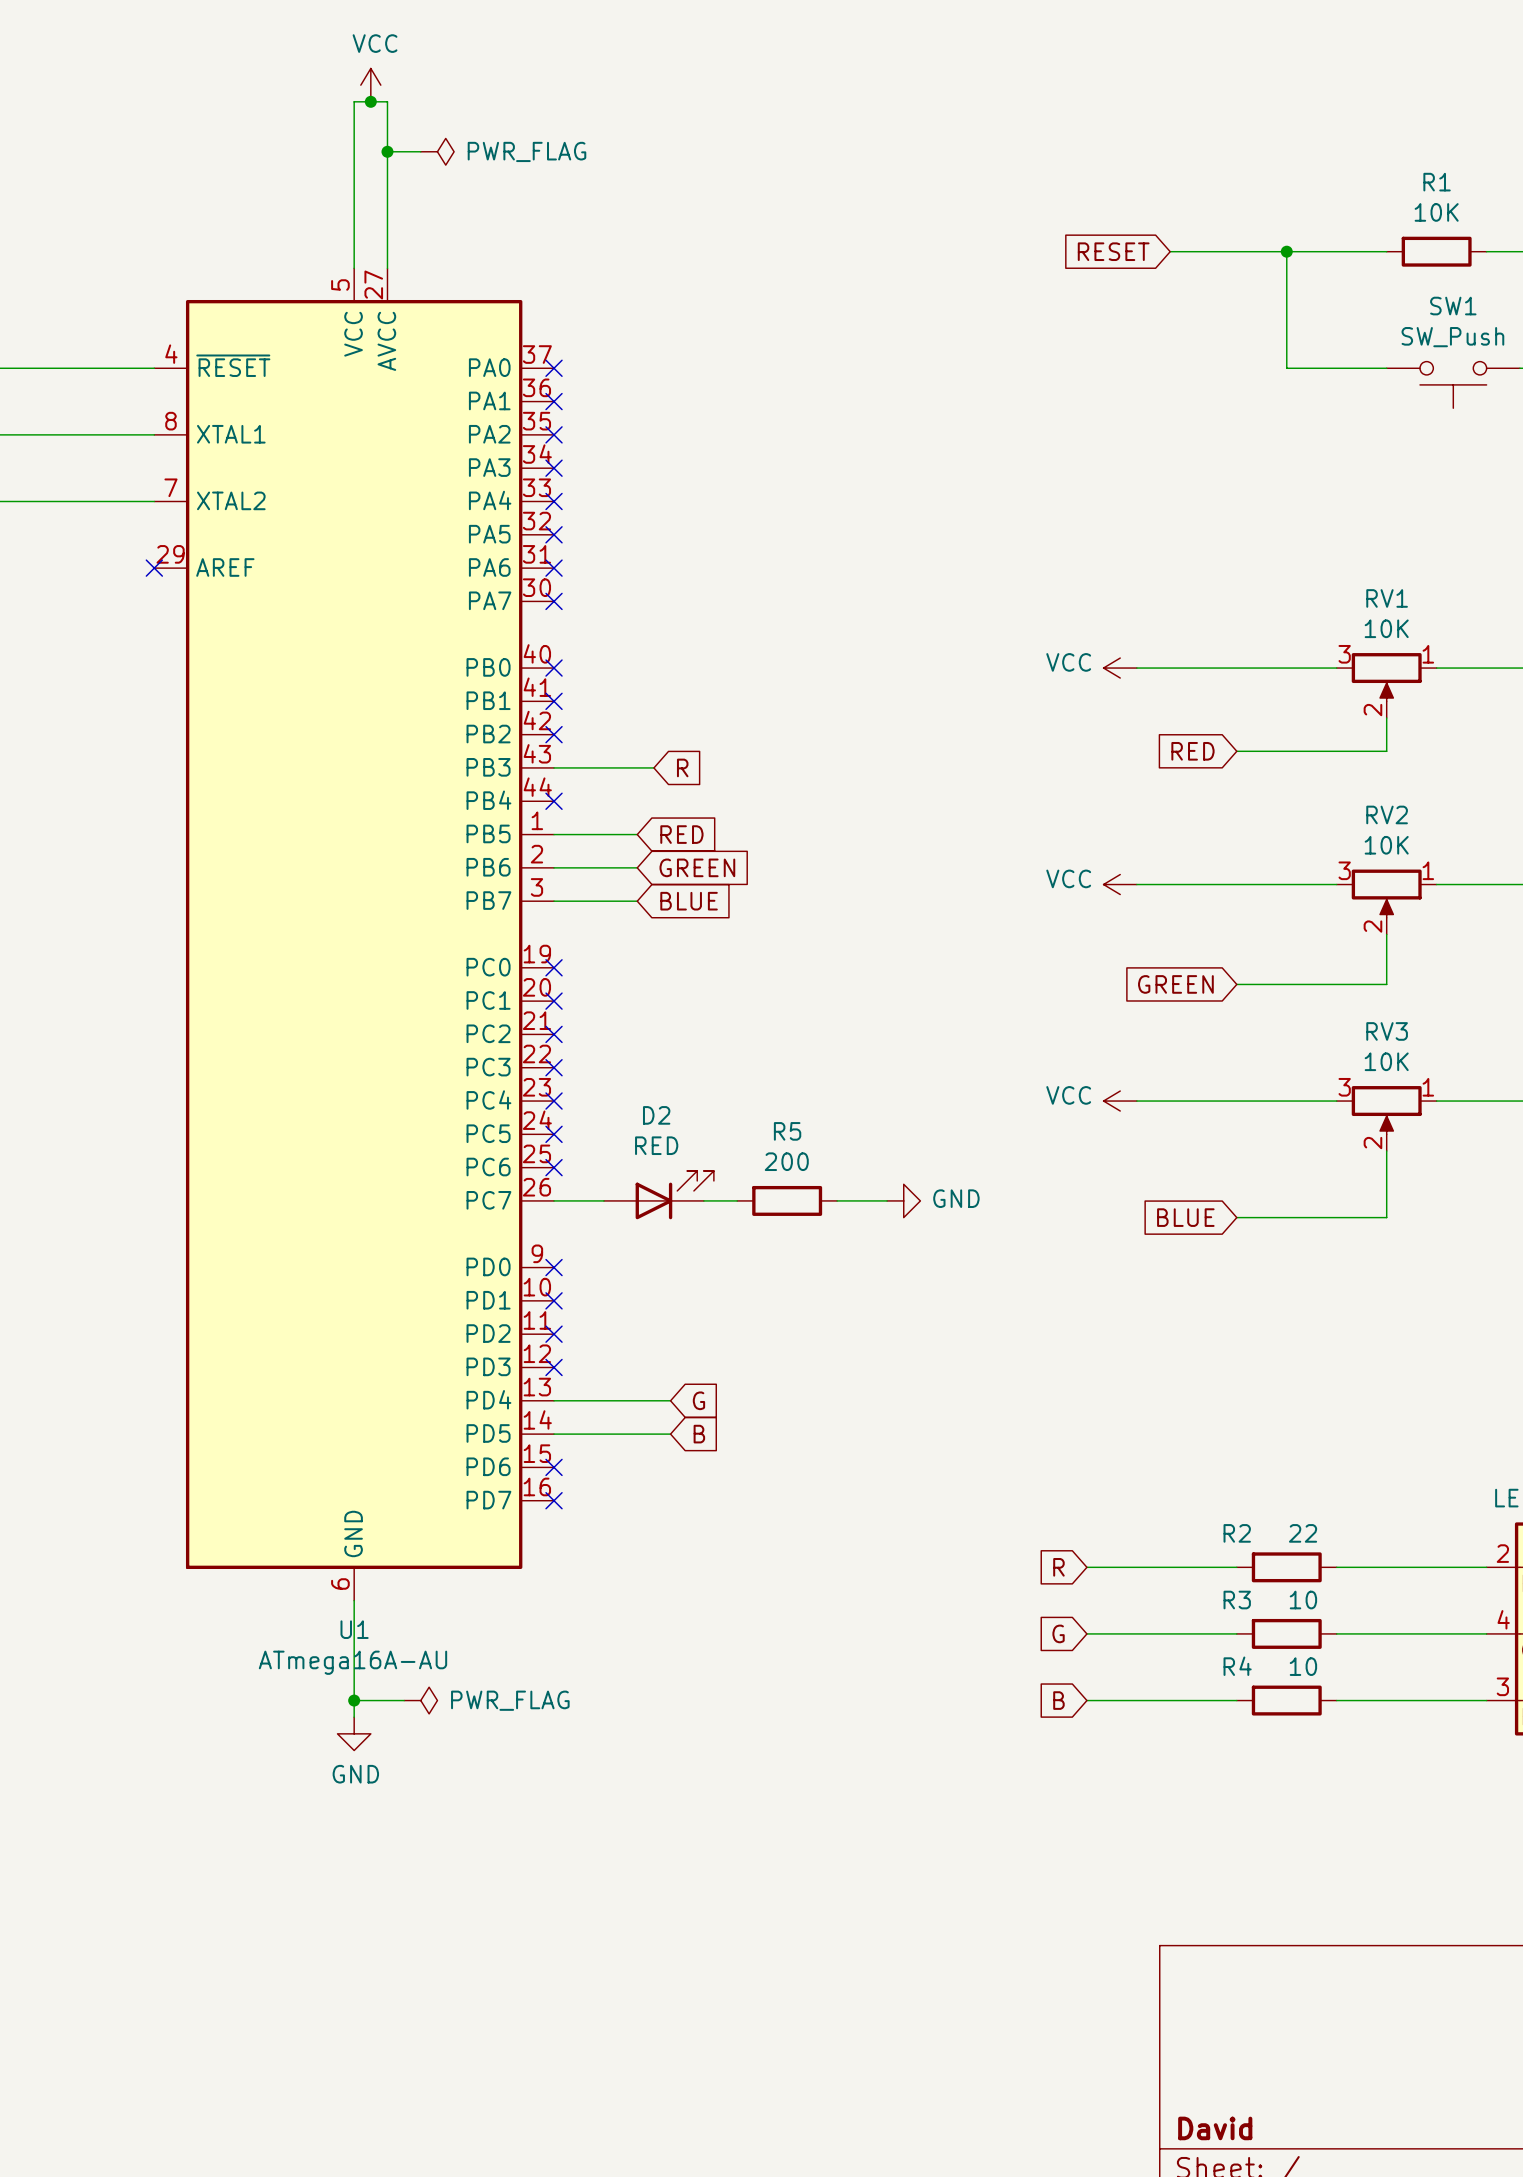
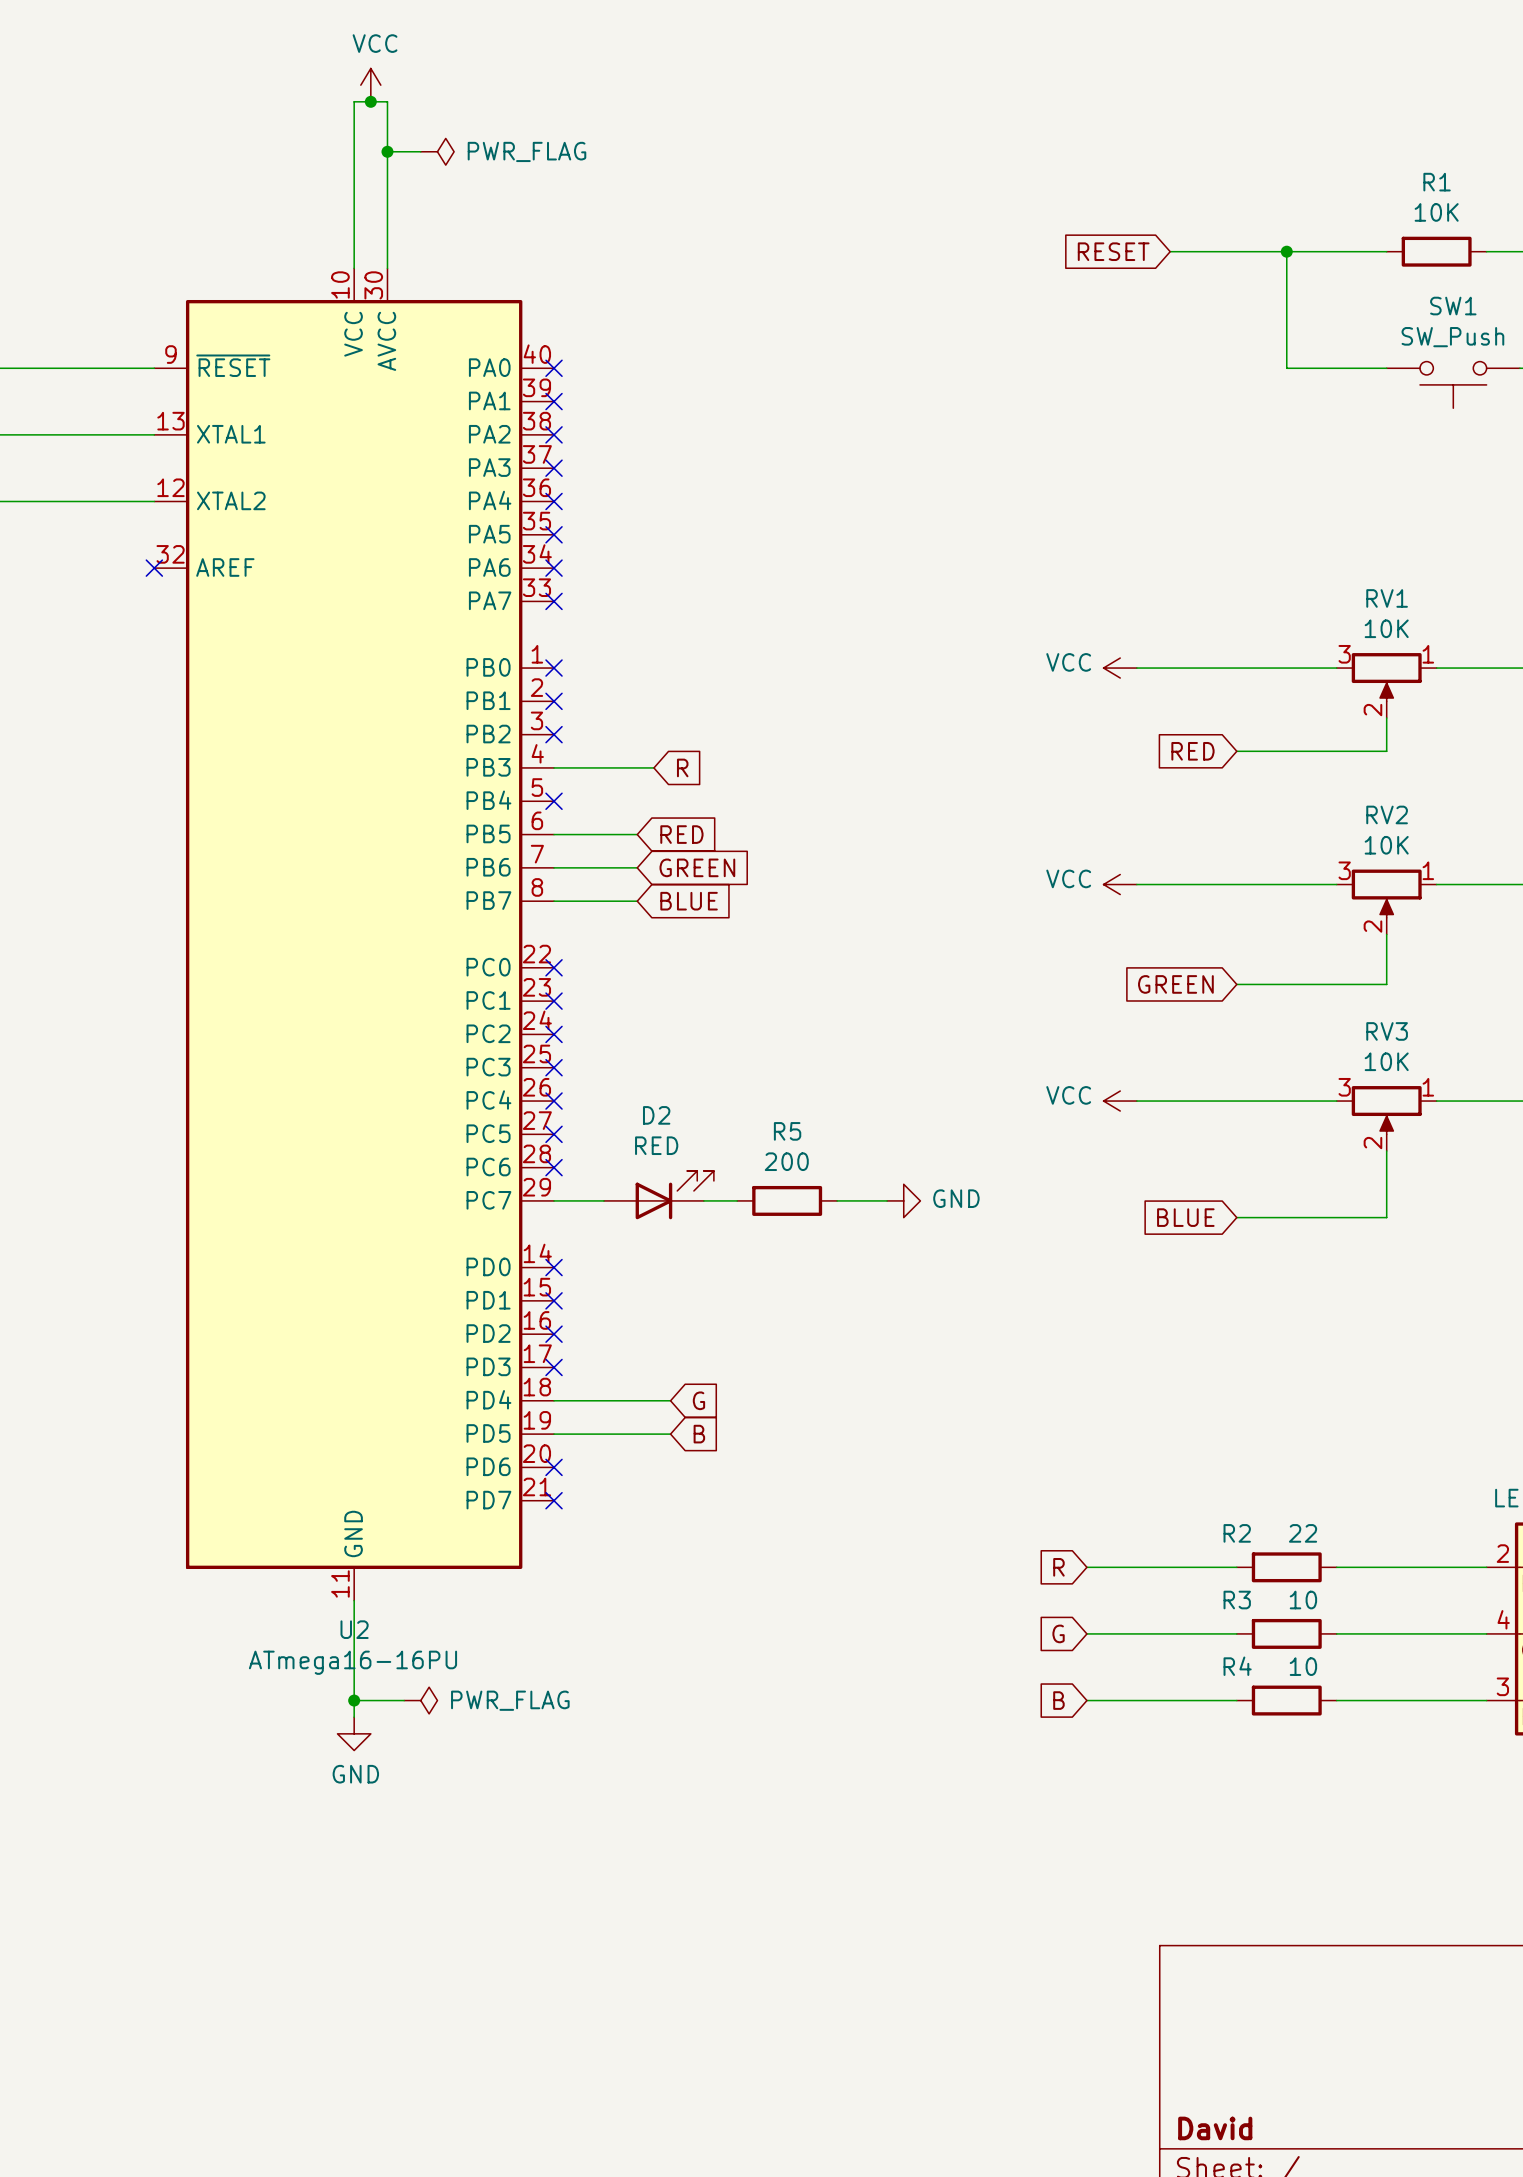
U1 symbol: [154, 268, 555, 1601] -> [154, 268, 555, 1601]
U1 name: U1 (354, 1629) -> U2 (354, 1629)
U1 value: ATmega16A-AU (352, 1662) -> ATmega16-16PU (352, 1662)

